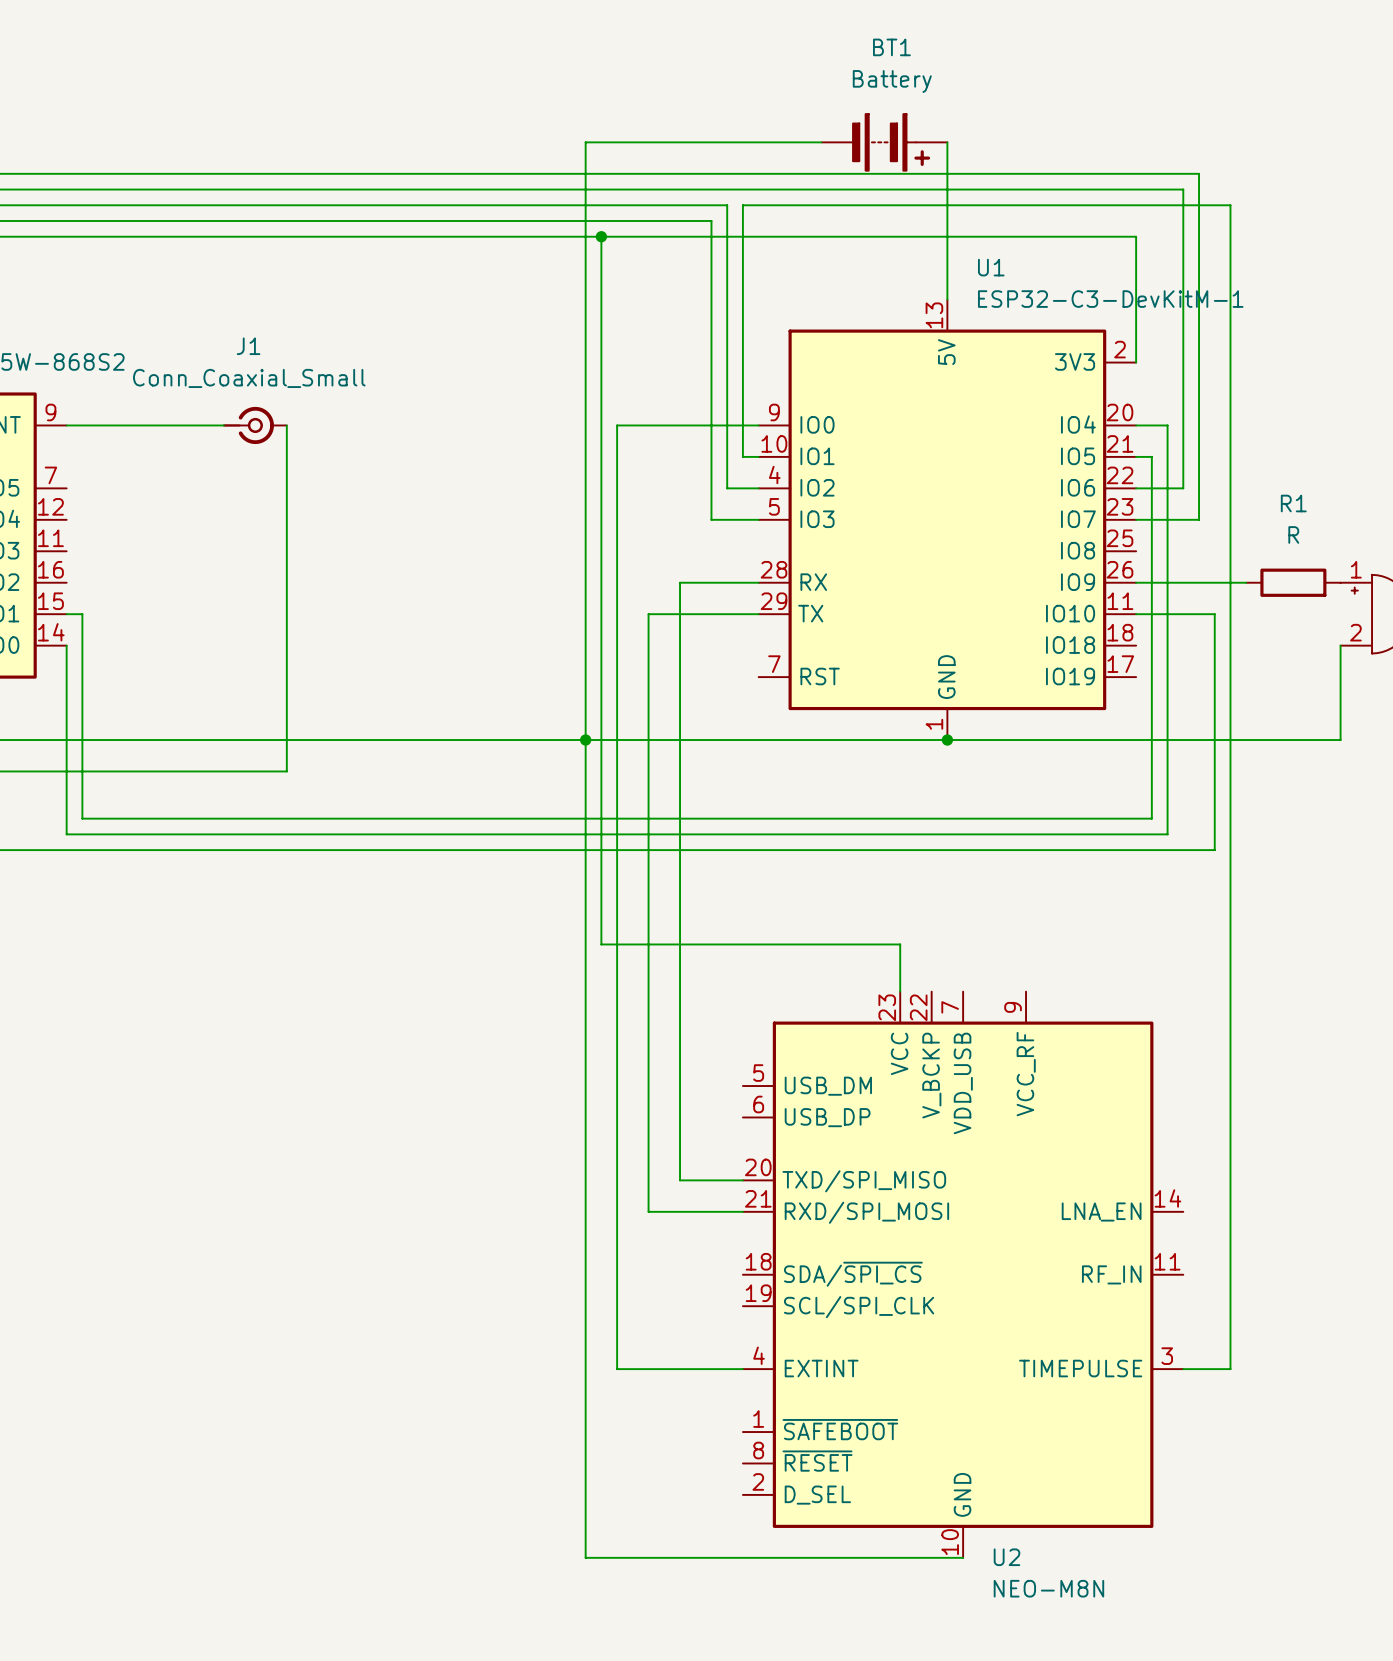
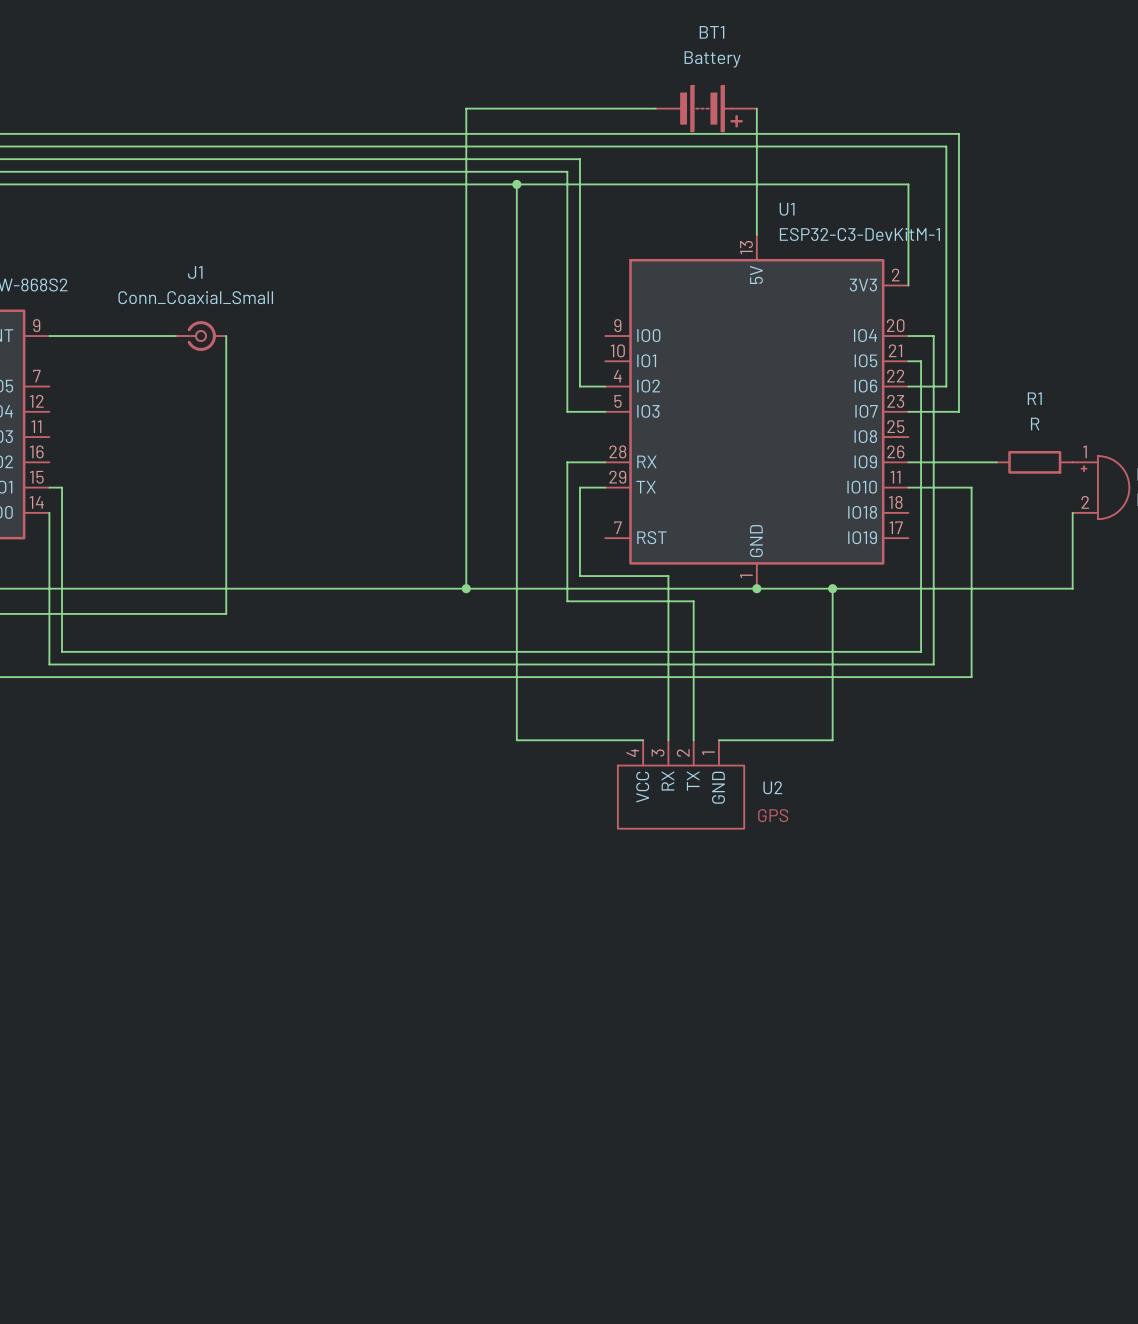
wire: (601, 236) (601, 944) (900, 944) (900, 991) -> none
junction position: (601, 236) -> (516, 184)
wire: none -> (516, 184) (516, 487)
wire: (758, 425) (617, 425) (617, 1369) (742, 1369) -> none
wire: (758, 456) (742, 456) (742, 205) (1230, 205) (1230, 1369) (1183, 1369) -> none
wire: (711, 582) (680, 582) (680, 1180) (742, 1180) -> (567, 462) (567, 601) (693, 601) (693, 740)
wire: (648, 614) (727, 614) -> (668, 740) (668, 576) (579, 576) (579, 487)
wire: (585, 740) (585, 1557) (963, 1557) -> none
wire: none -> (832, 588) (832, 740) (718, 740)
junction: none -> (832, 588)
wire: (648, 928) (648, 1211) (742, 1211) -> (516, 740) (643, 740)
U2 symbol: [742, 991, 1184, 1558] -> [617, 740, 745, 829]
U2 name position: U2 (1007, 1557) -> U2 (772, 787)
U2 value: NEO-M8N (1048, 1588) -> none

